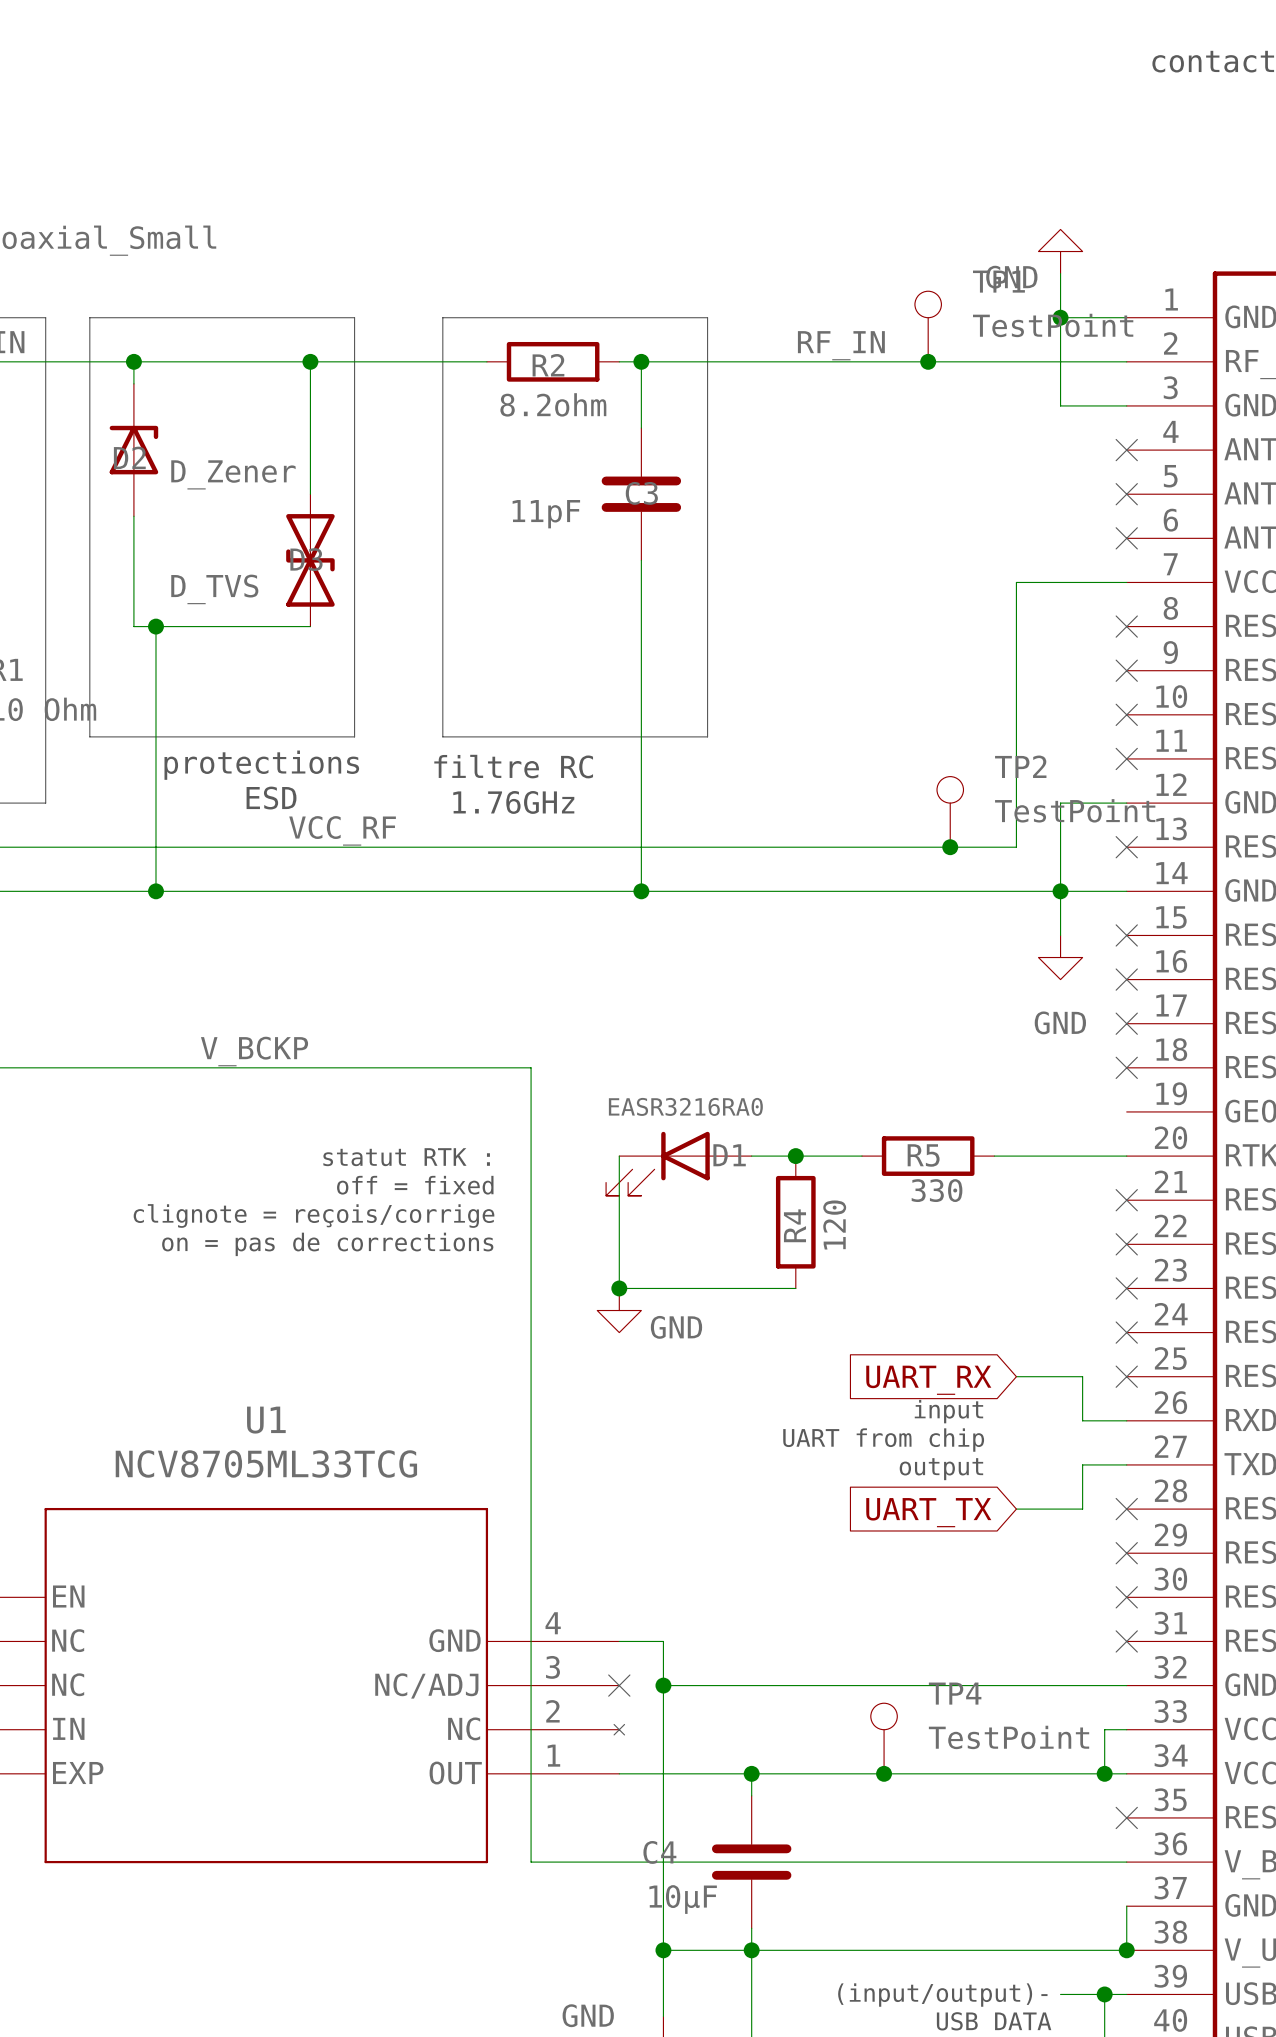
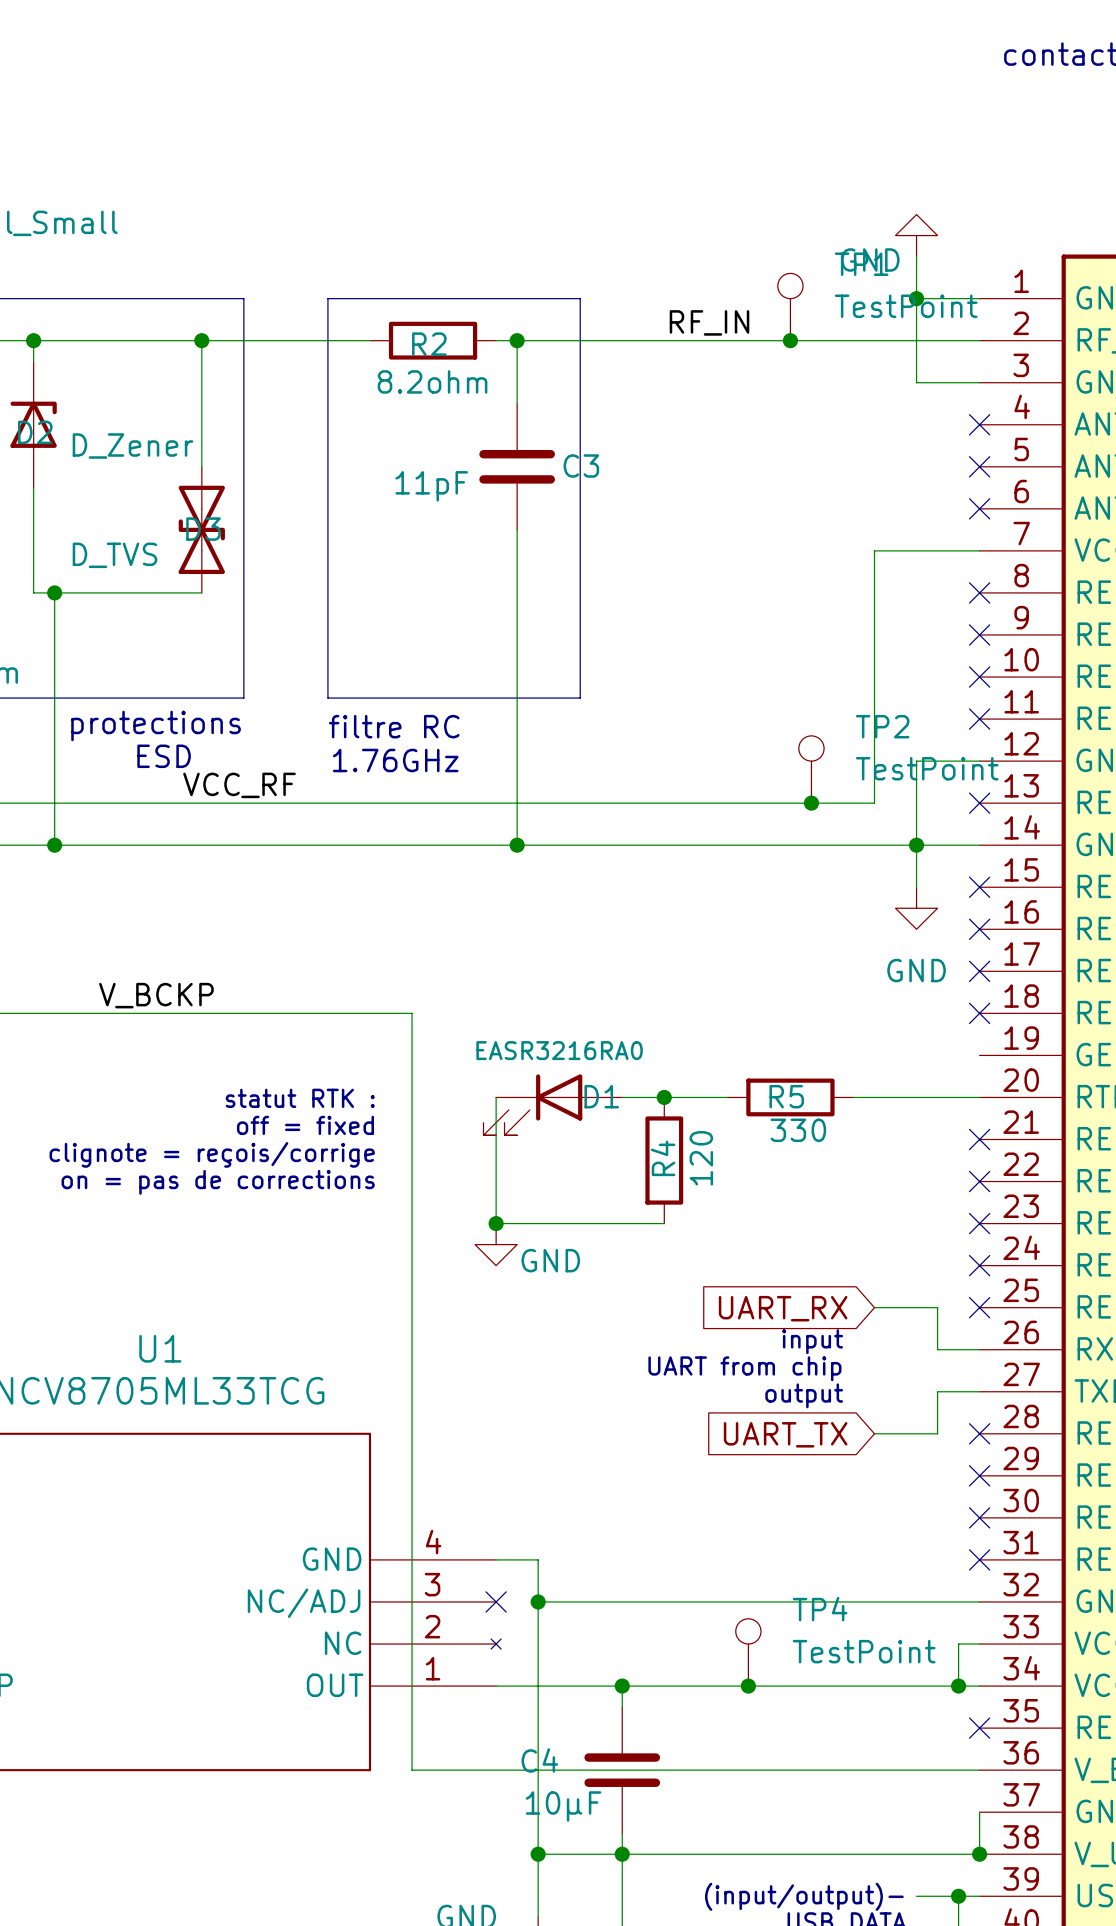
C3 name position: C3 (641, 493) -> C3 (581, 466)

